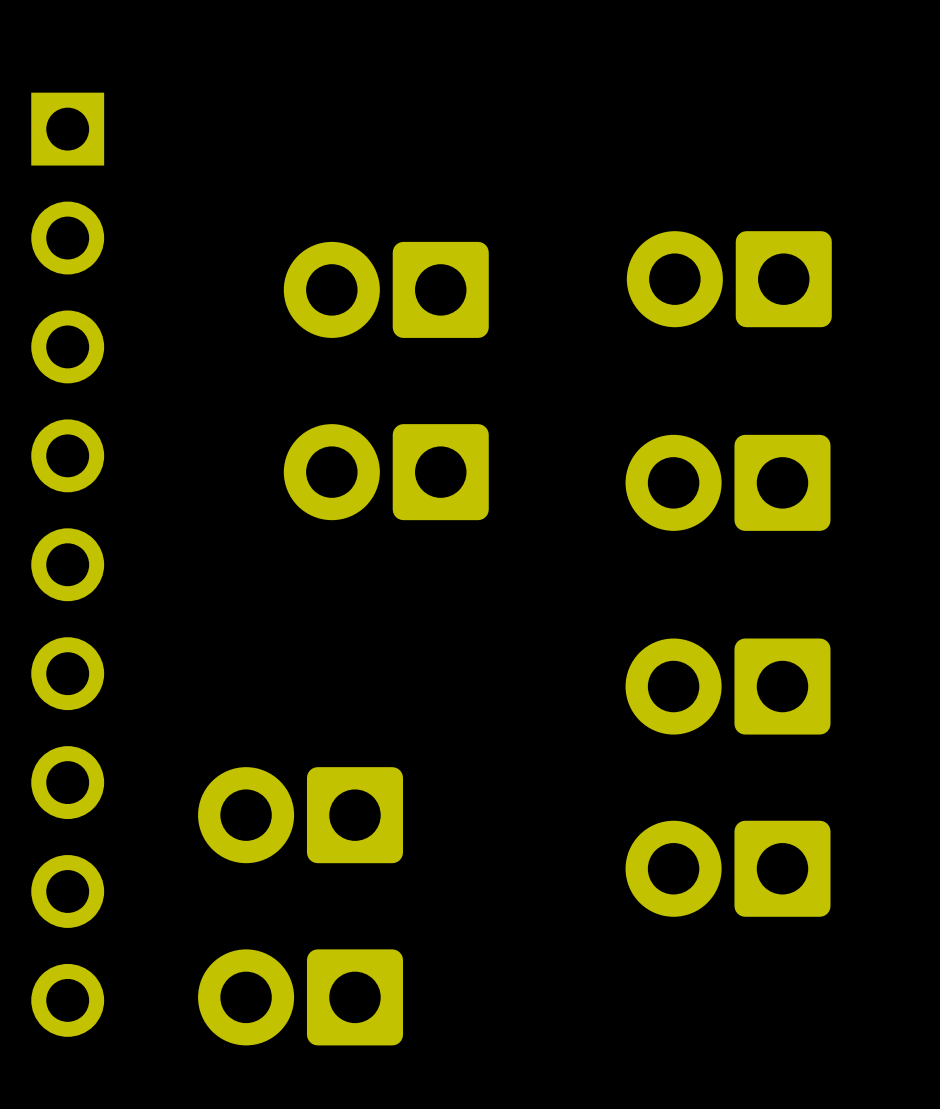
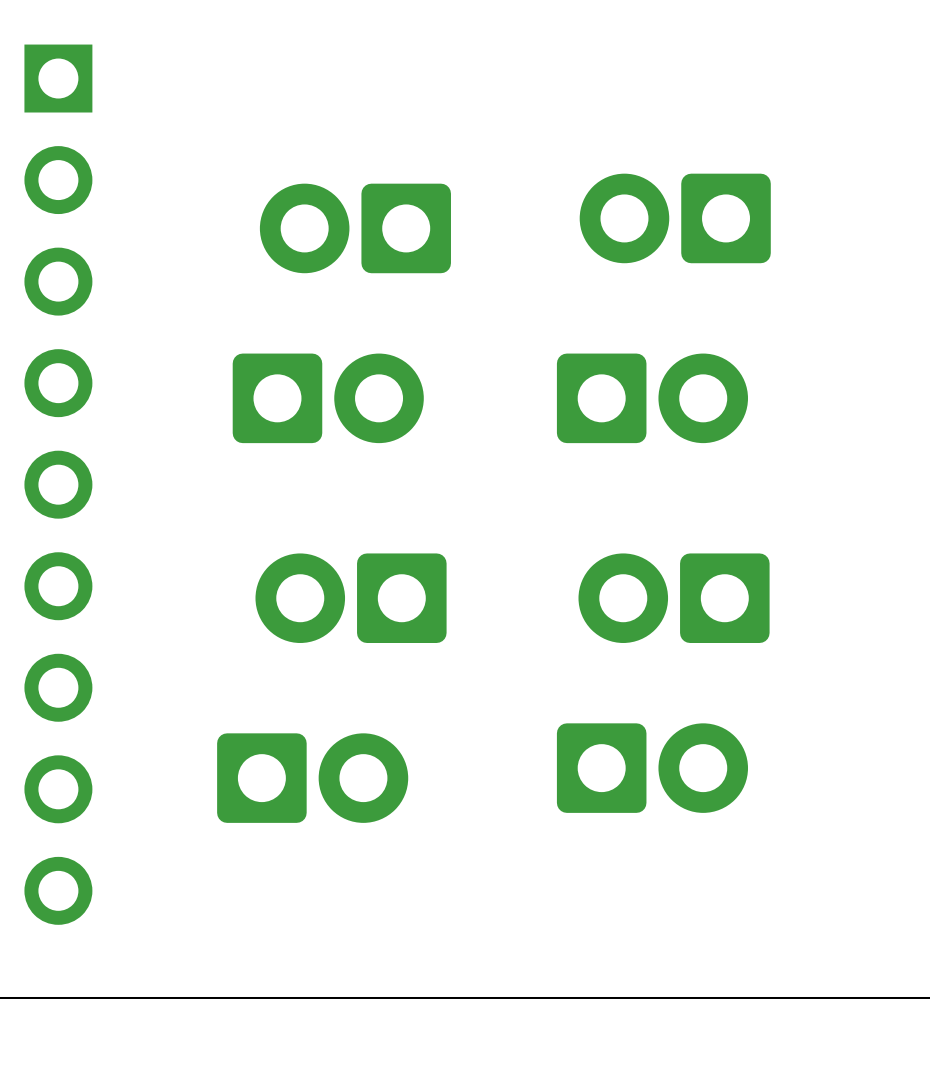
part rotation: 0° (386, 472) -> 180° (328, 398)
part rotation: 0° (728, 482) -> 180° (652, 398)
part: none -> (351, 598)
part: (300, 815) -> none
part rotation: 0° (728, 868) -> 180° (652, 768)
part: none -> (312, 778)
part: (300, 997) -> none

